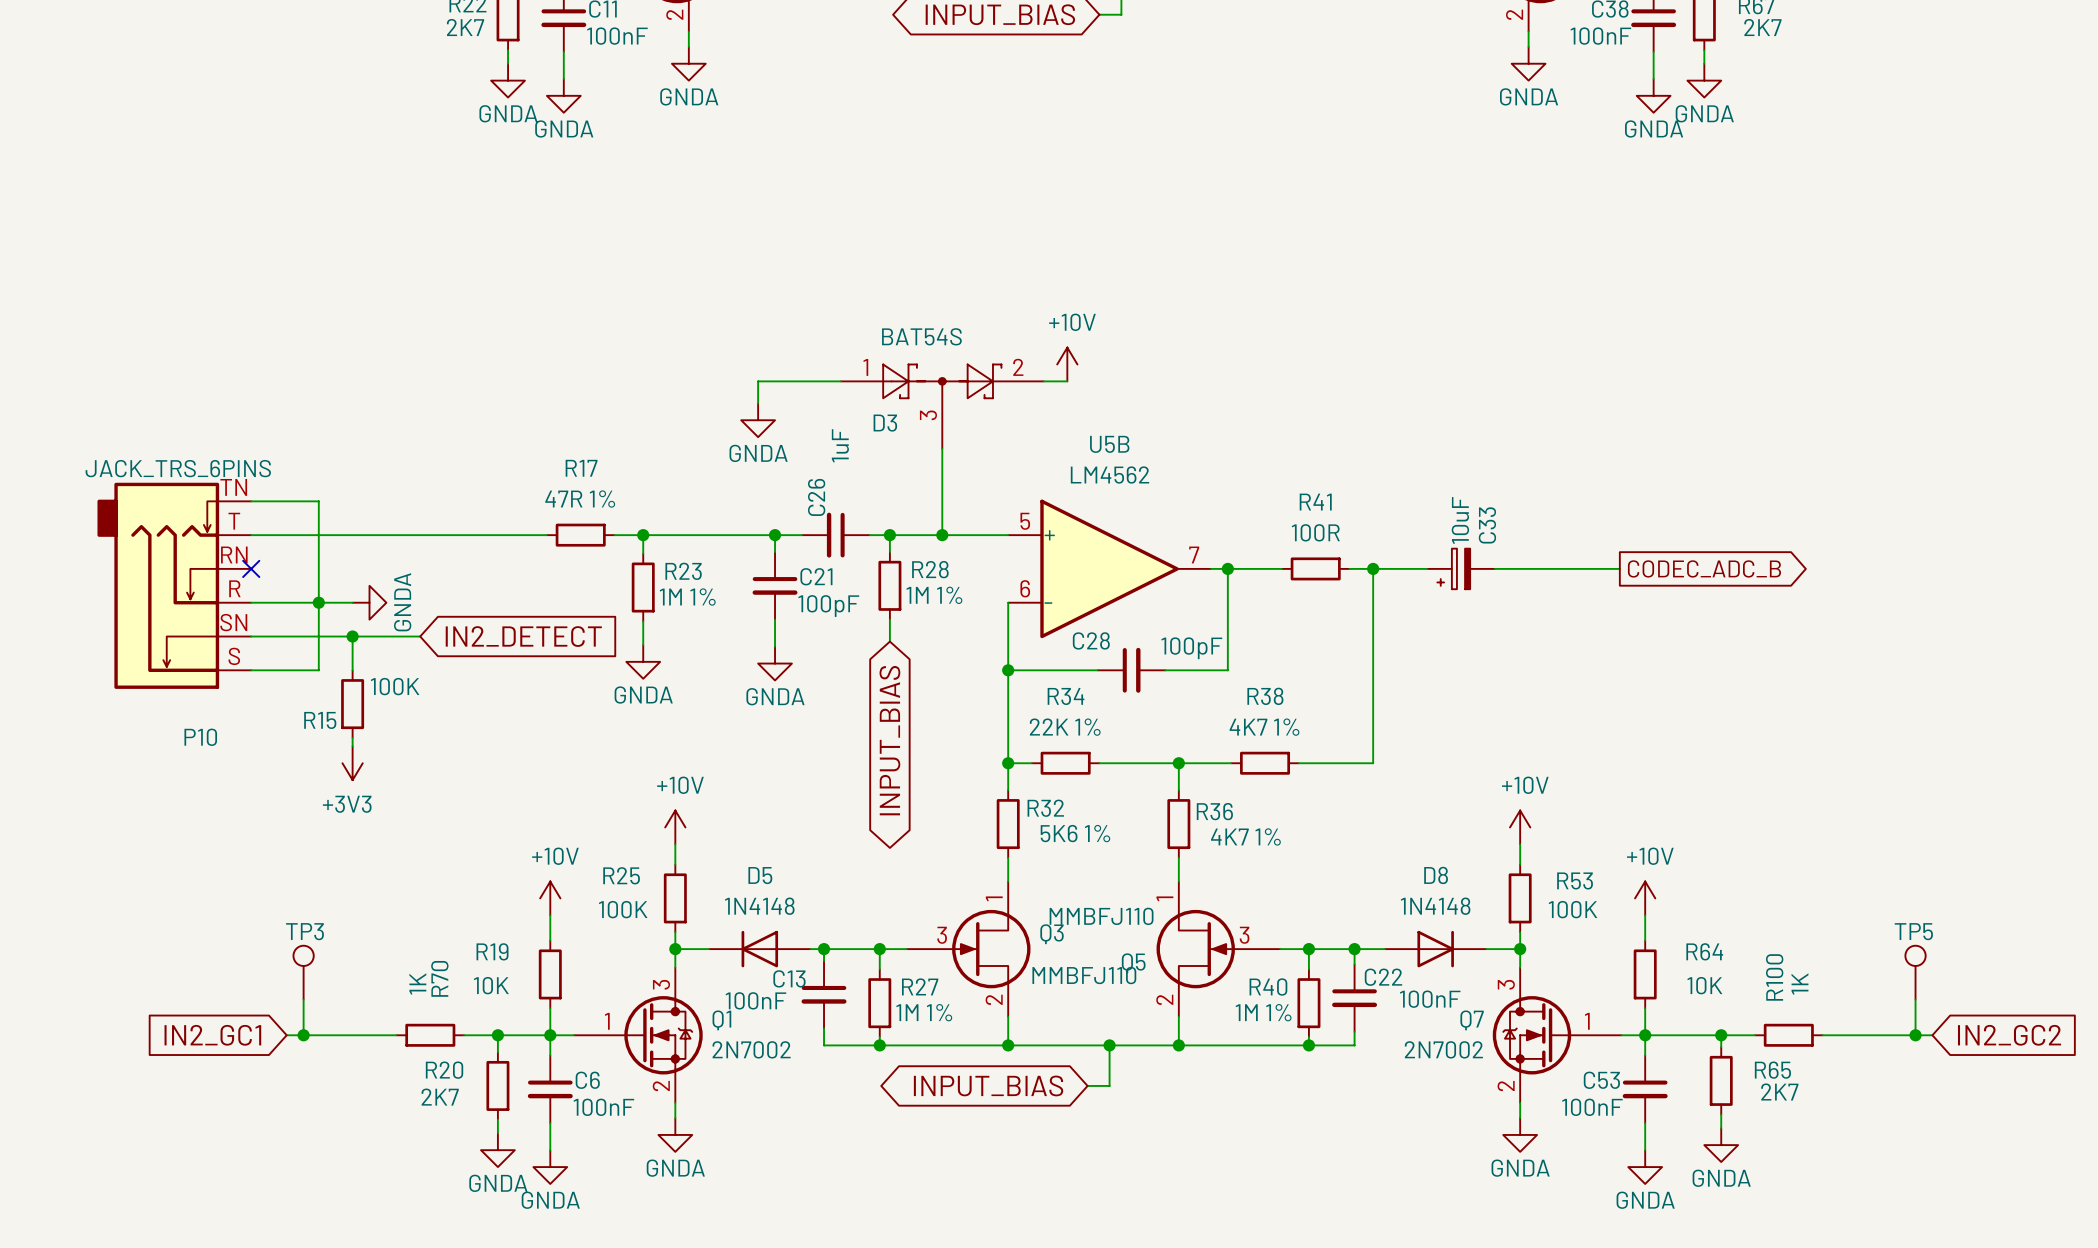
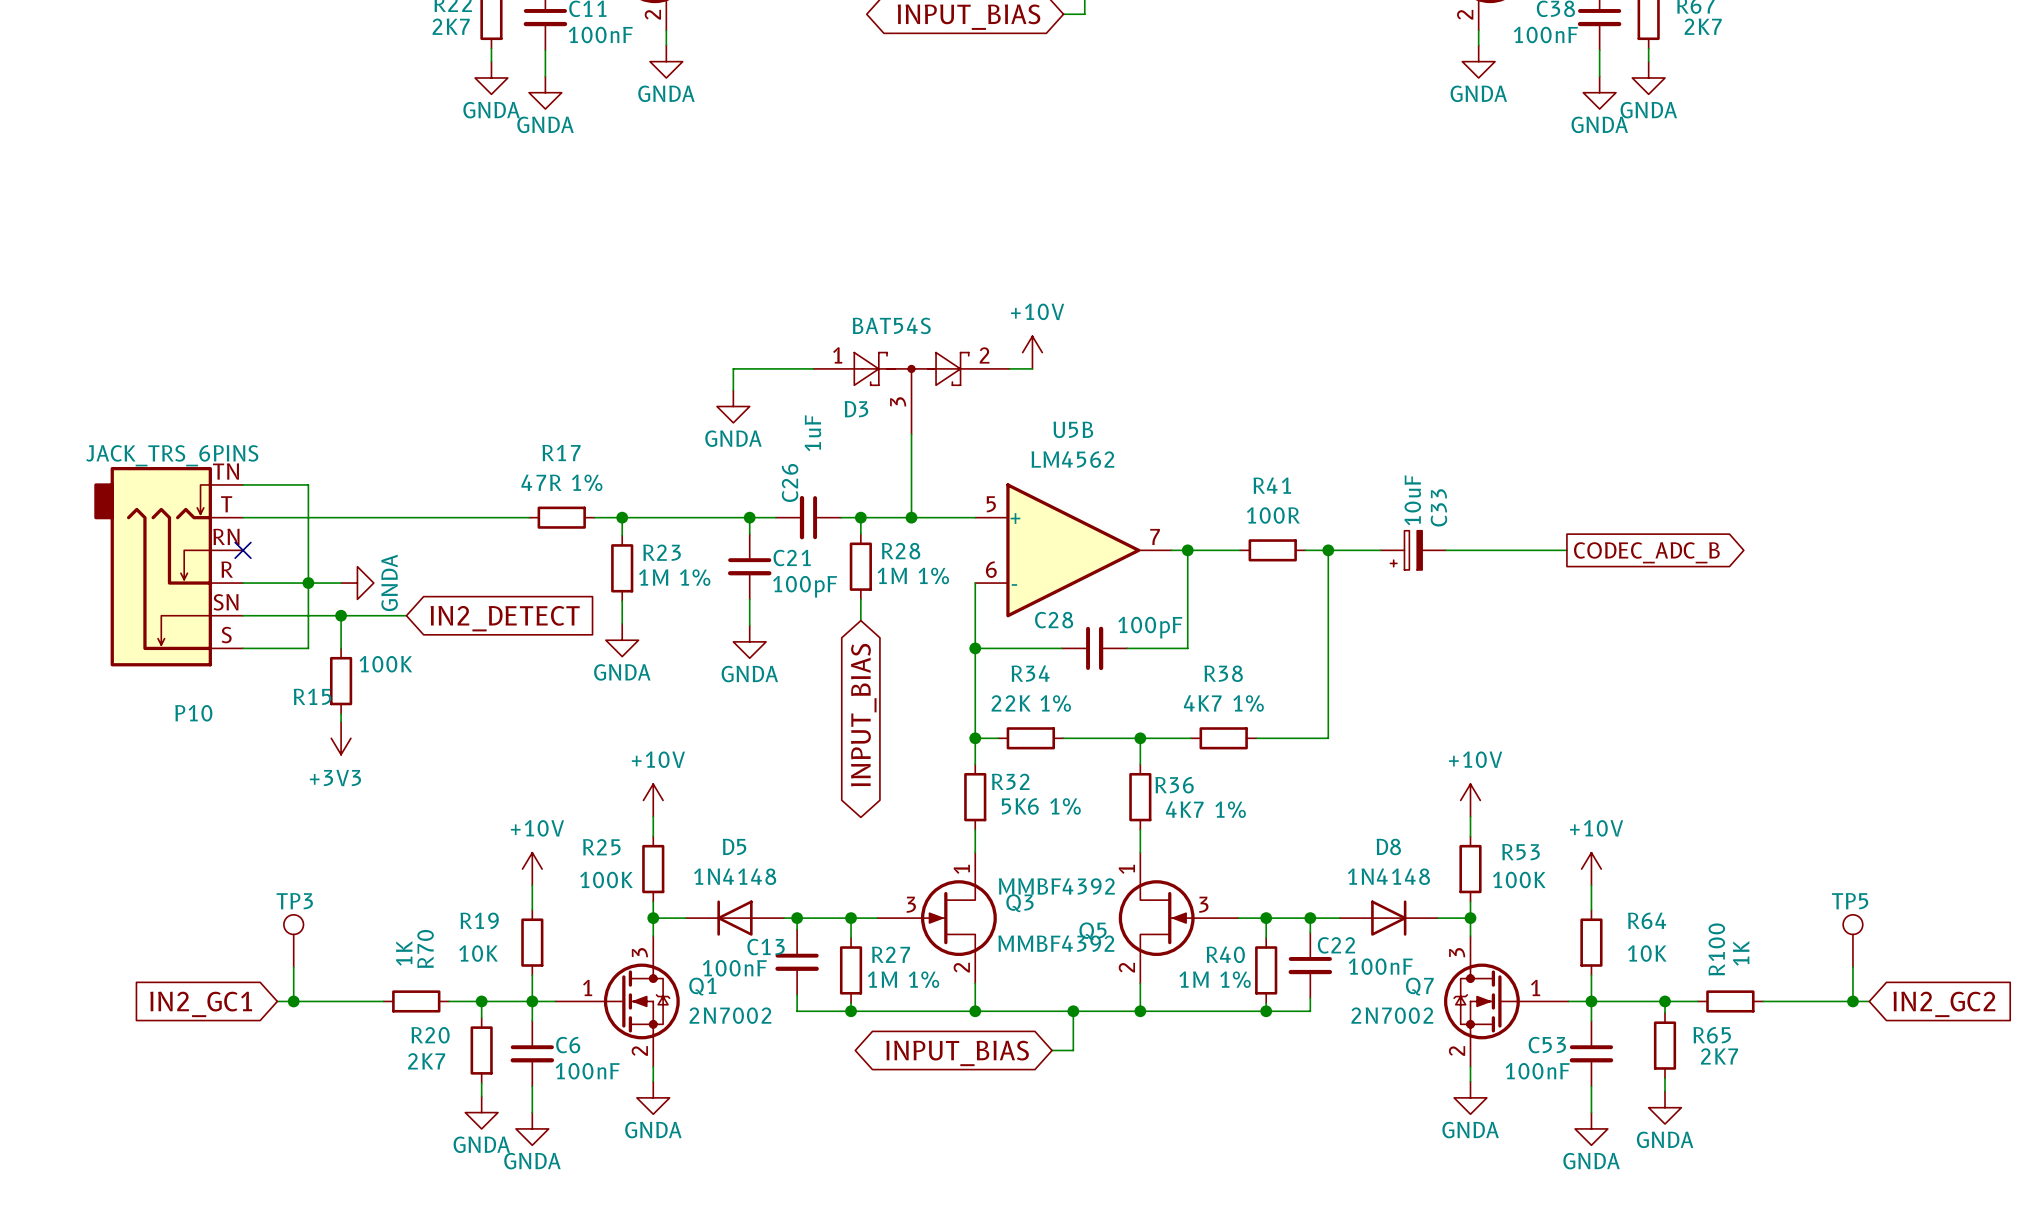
Q5 value: MMBFJ110 (1101, 916) -> MMBF4392 (1056, 886)
Q3 value: MMBFJ110 (1084, 975) -> MMBF4392 (1056, 943)

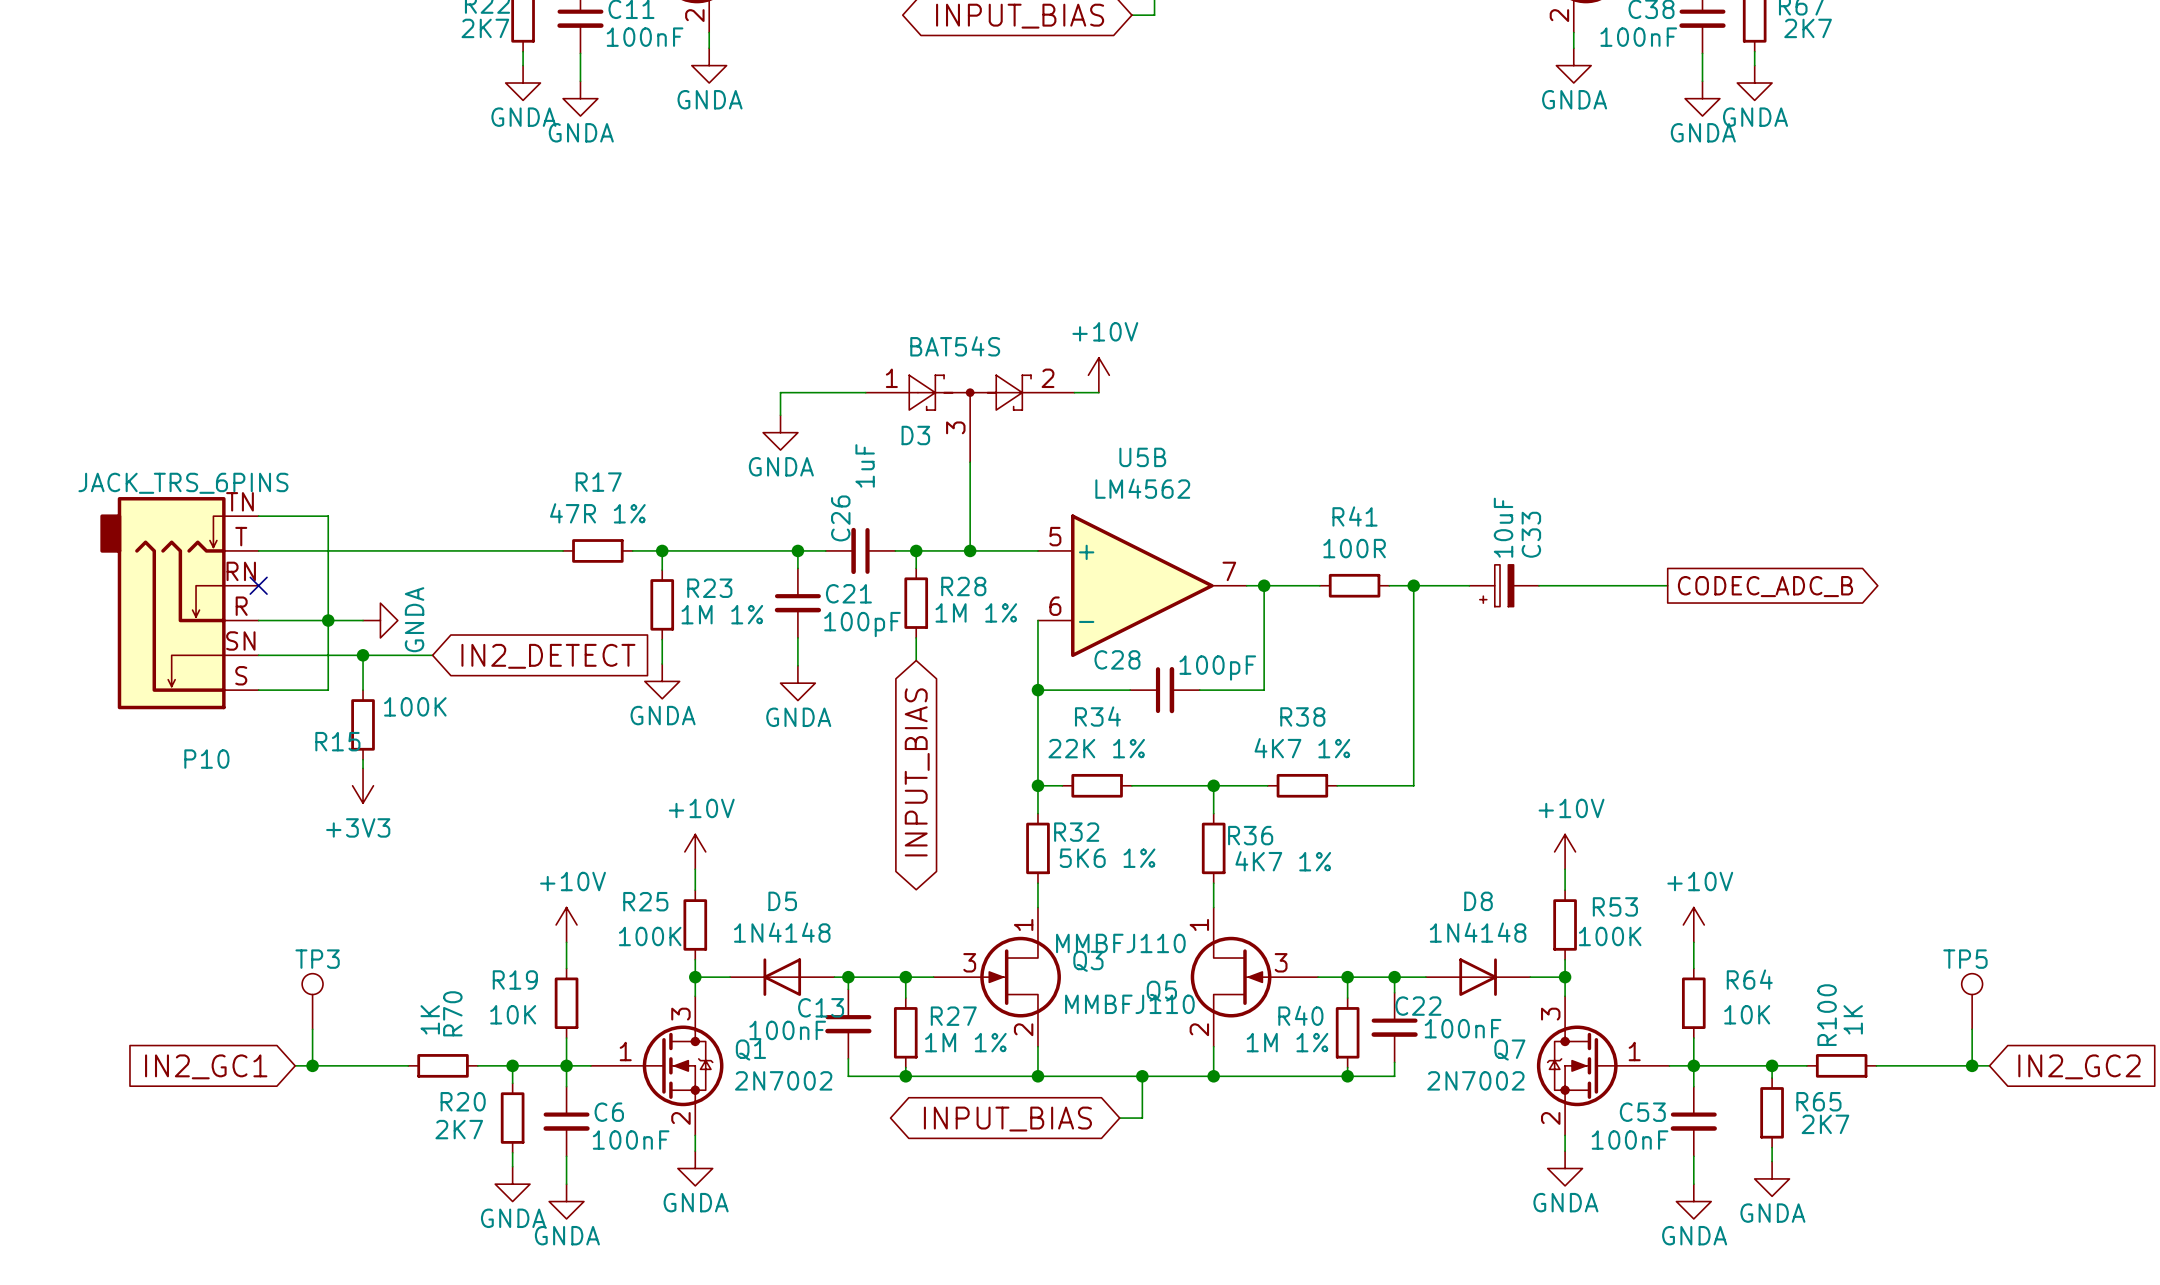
Q5 value: MMBF4392 (1056, 886) -> MMBFJ110 (1120, 943)
Q3 value: MMBF4392 (1056, 943) -> MMBFJ110 (1129, 1004)

